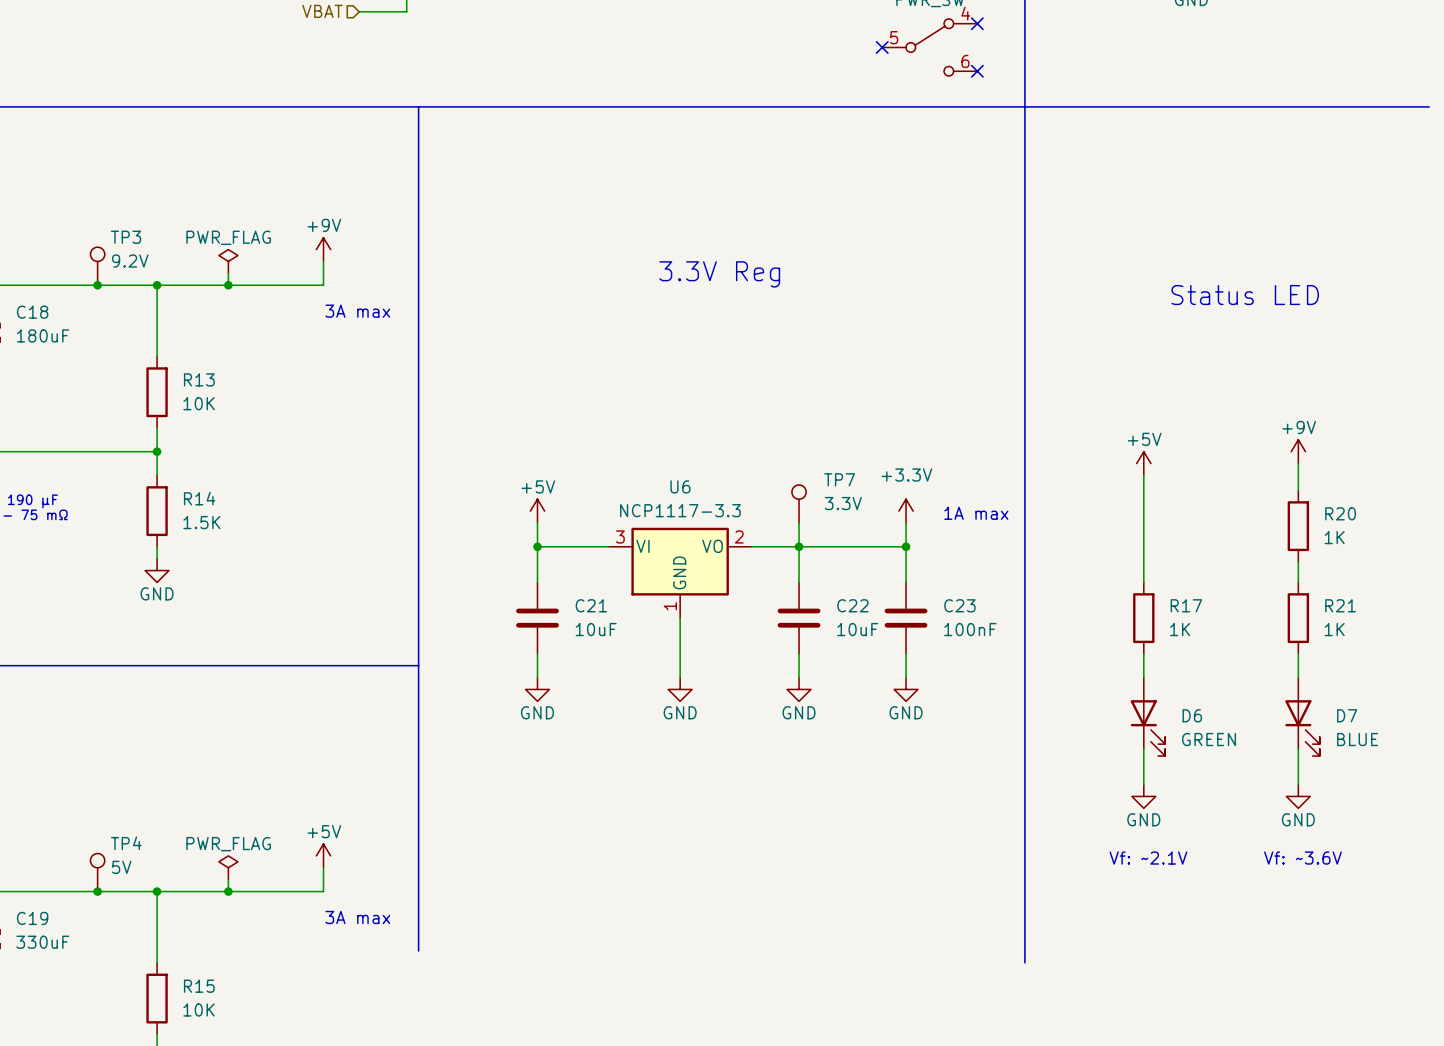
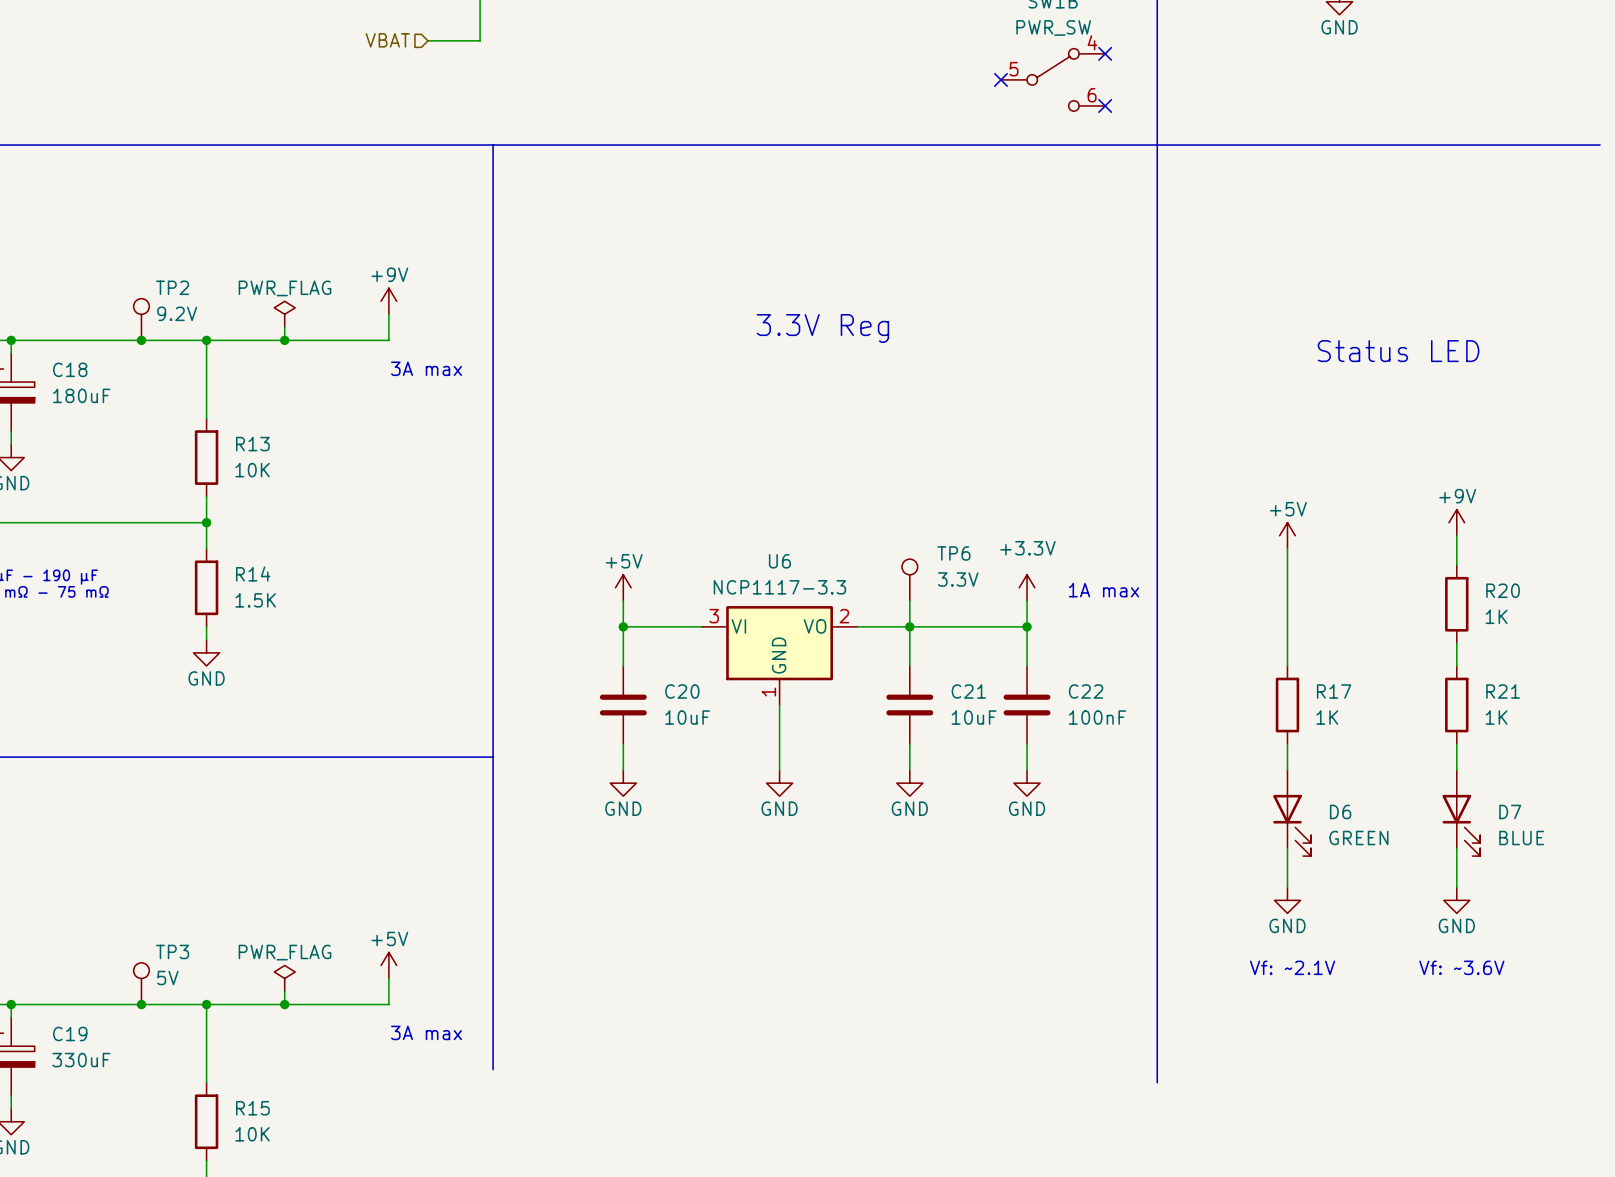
TP3 name: TP3 (126, 237) -> TP2 (172, 287)
TP7 name: TP7 (839, 479) -> TP6 (953, 553)
C21 name: C21 (591, 605) -> C20 (682, 691)
C22 name: C22 (852, 605) -> C21 (968, 691)
C23 name: C23 (959, 605) -> C22 (1086, 691)
TP4 name: TP4 (126, 843) -> TP3 (172, 951)

